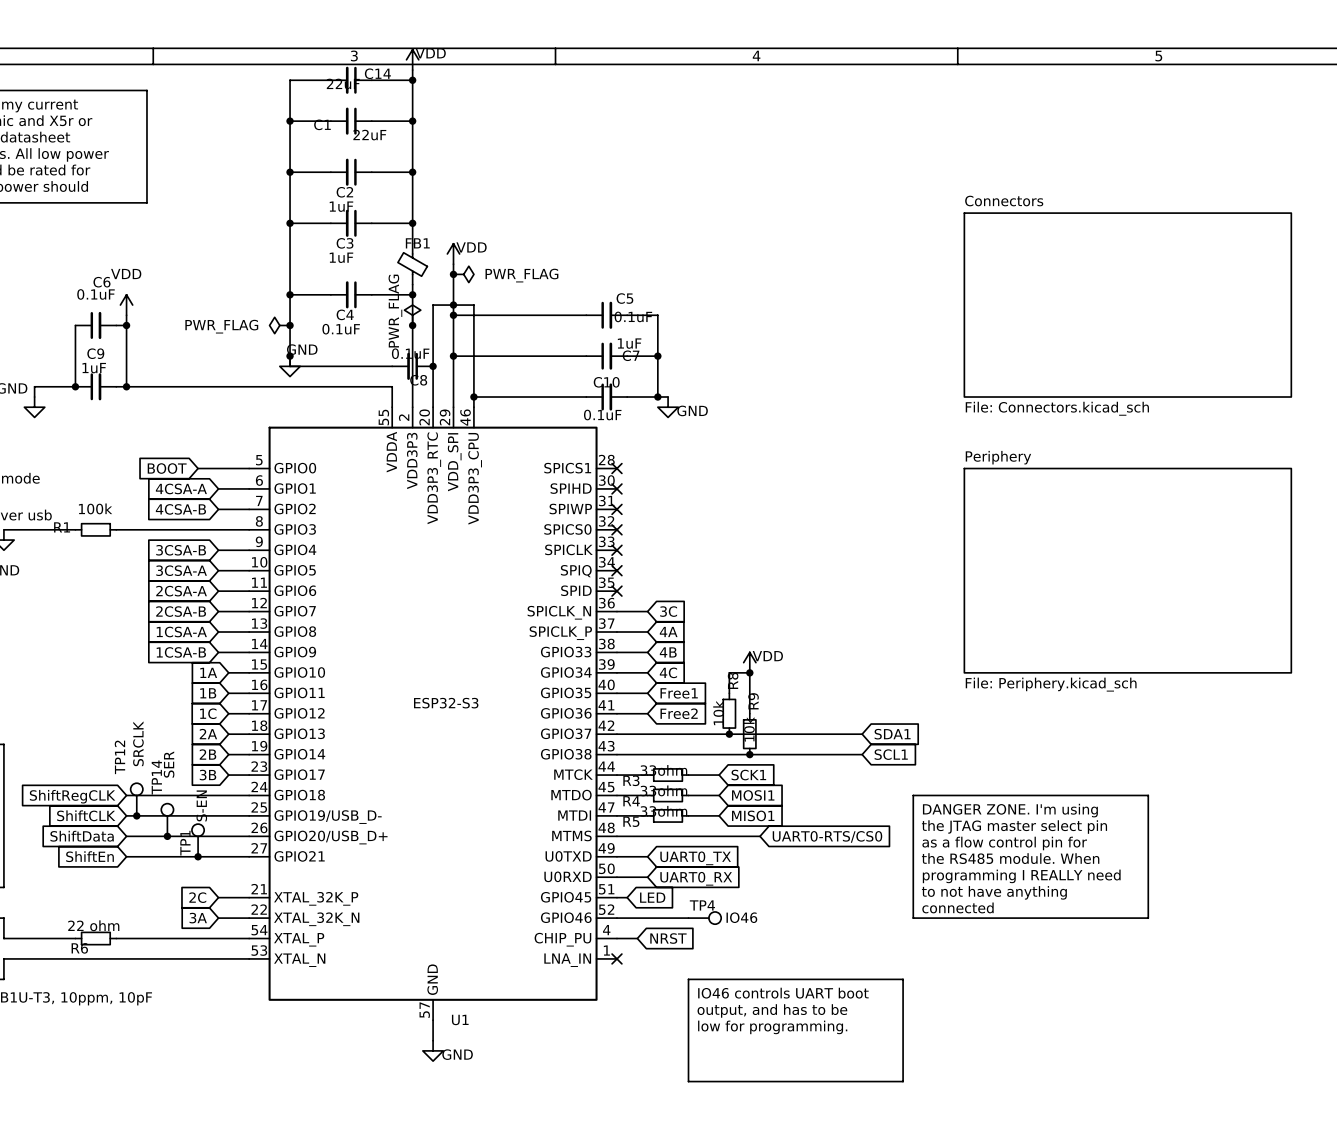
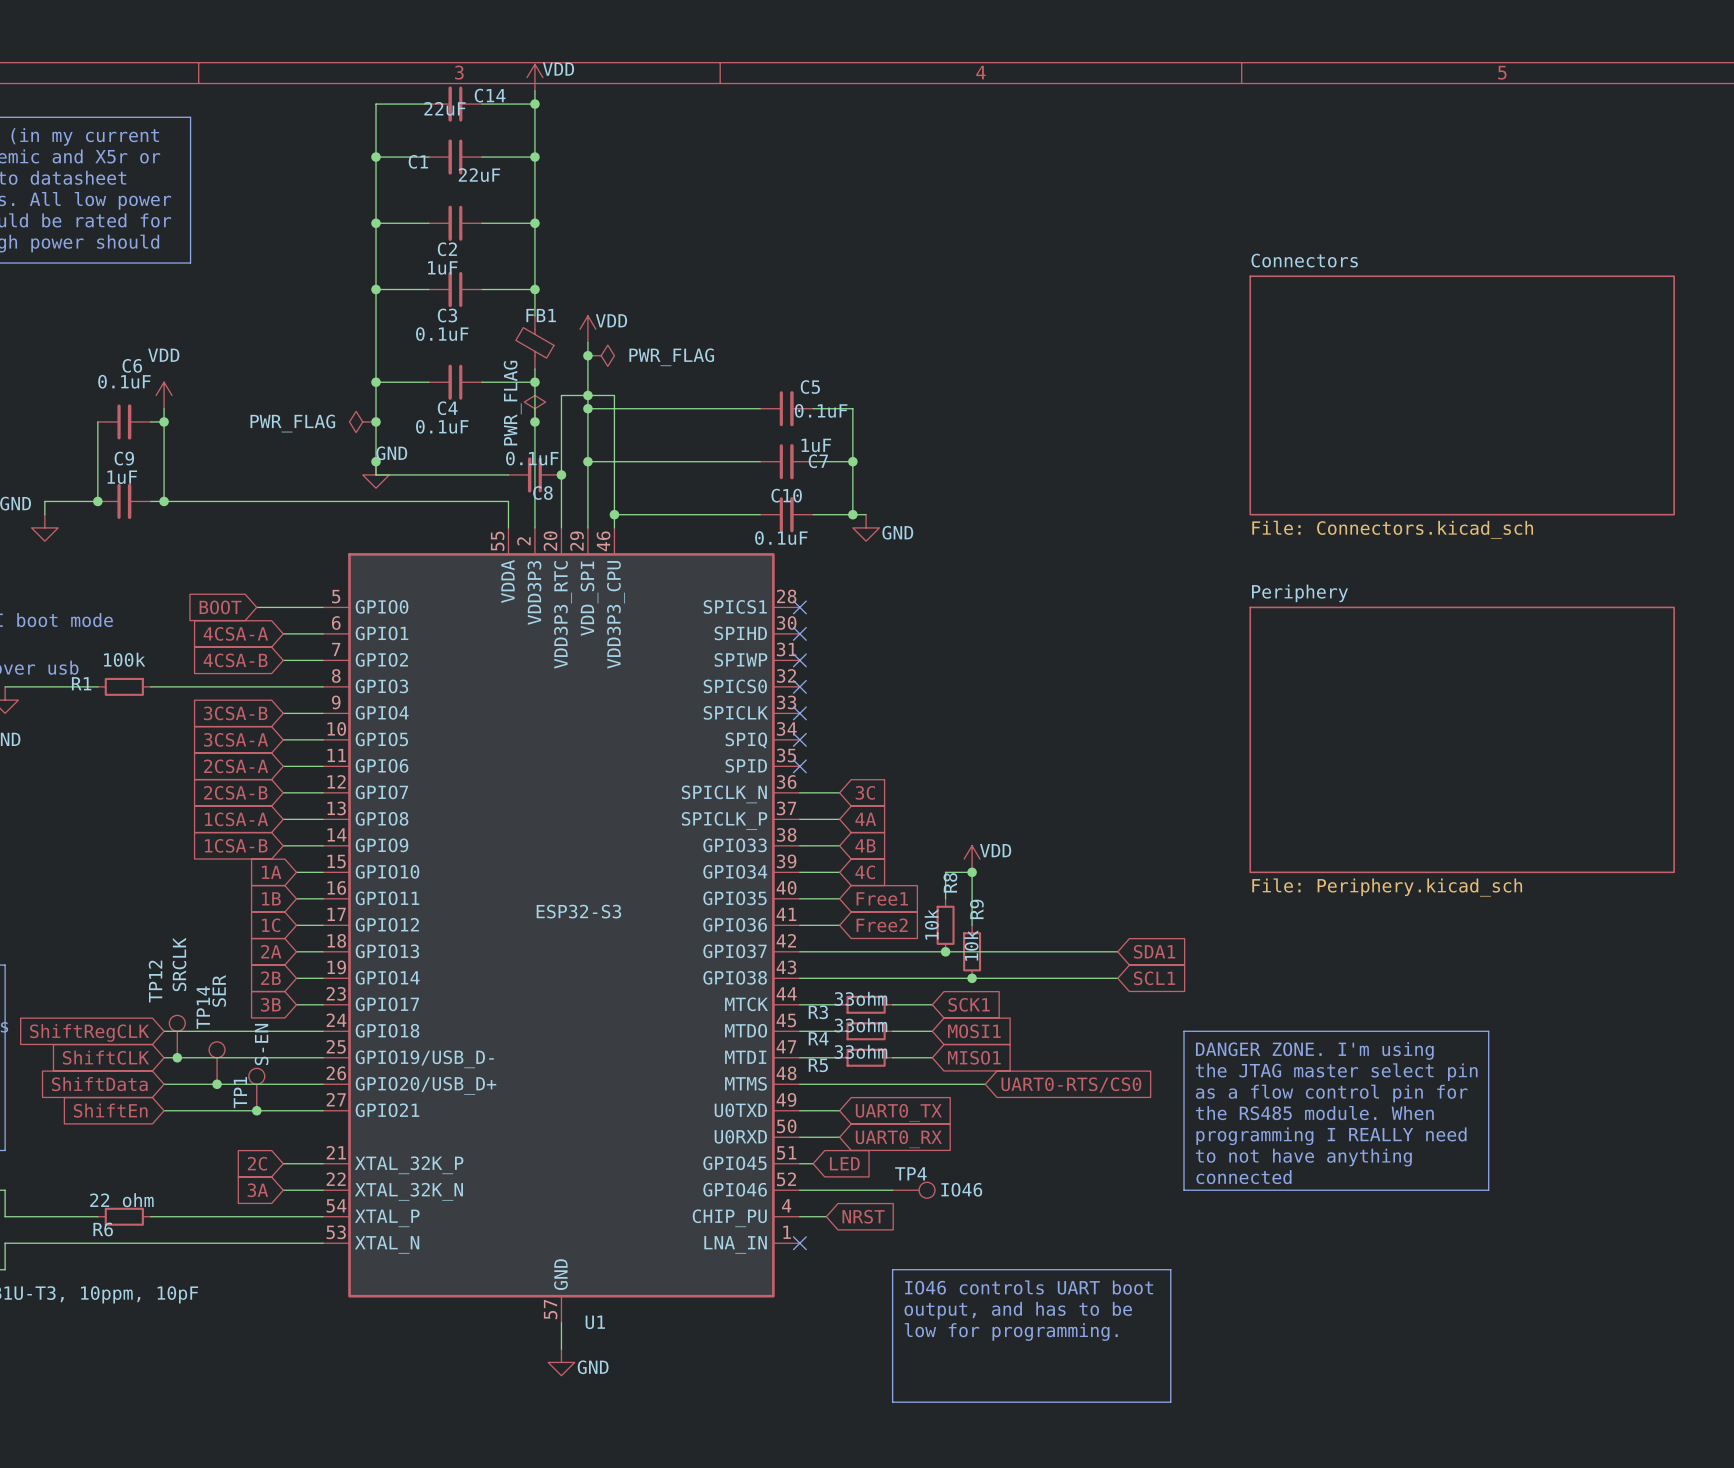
C3 value: 1uF (341, 257) -> 0.1uF (442, 334)

